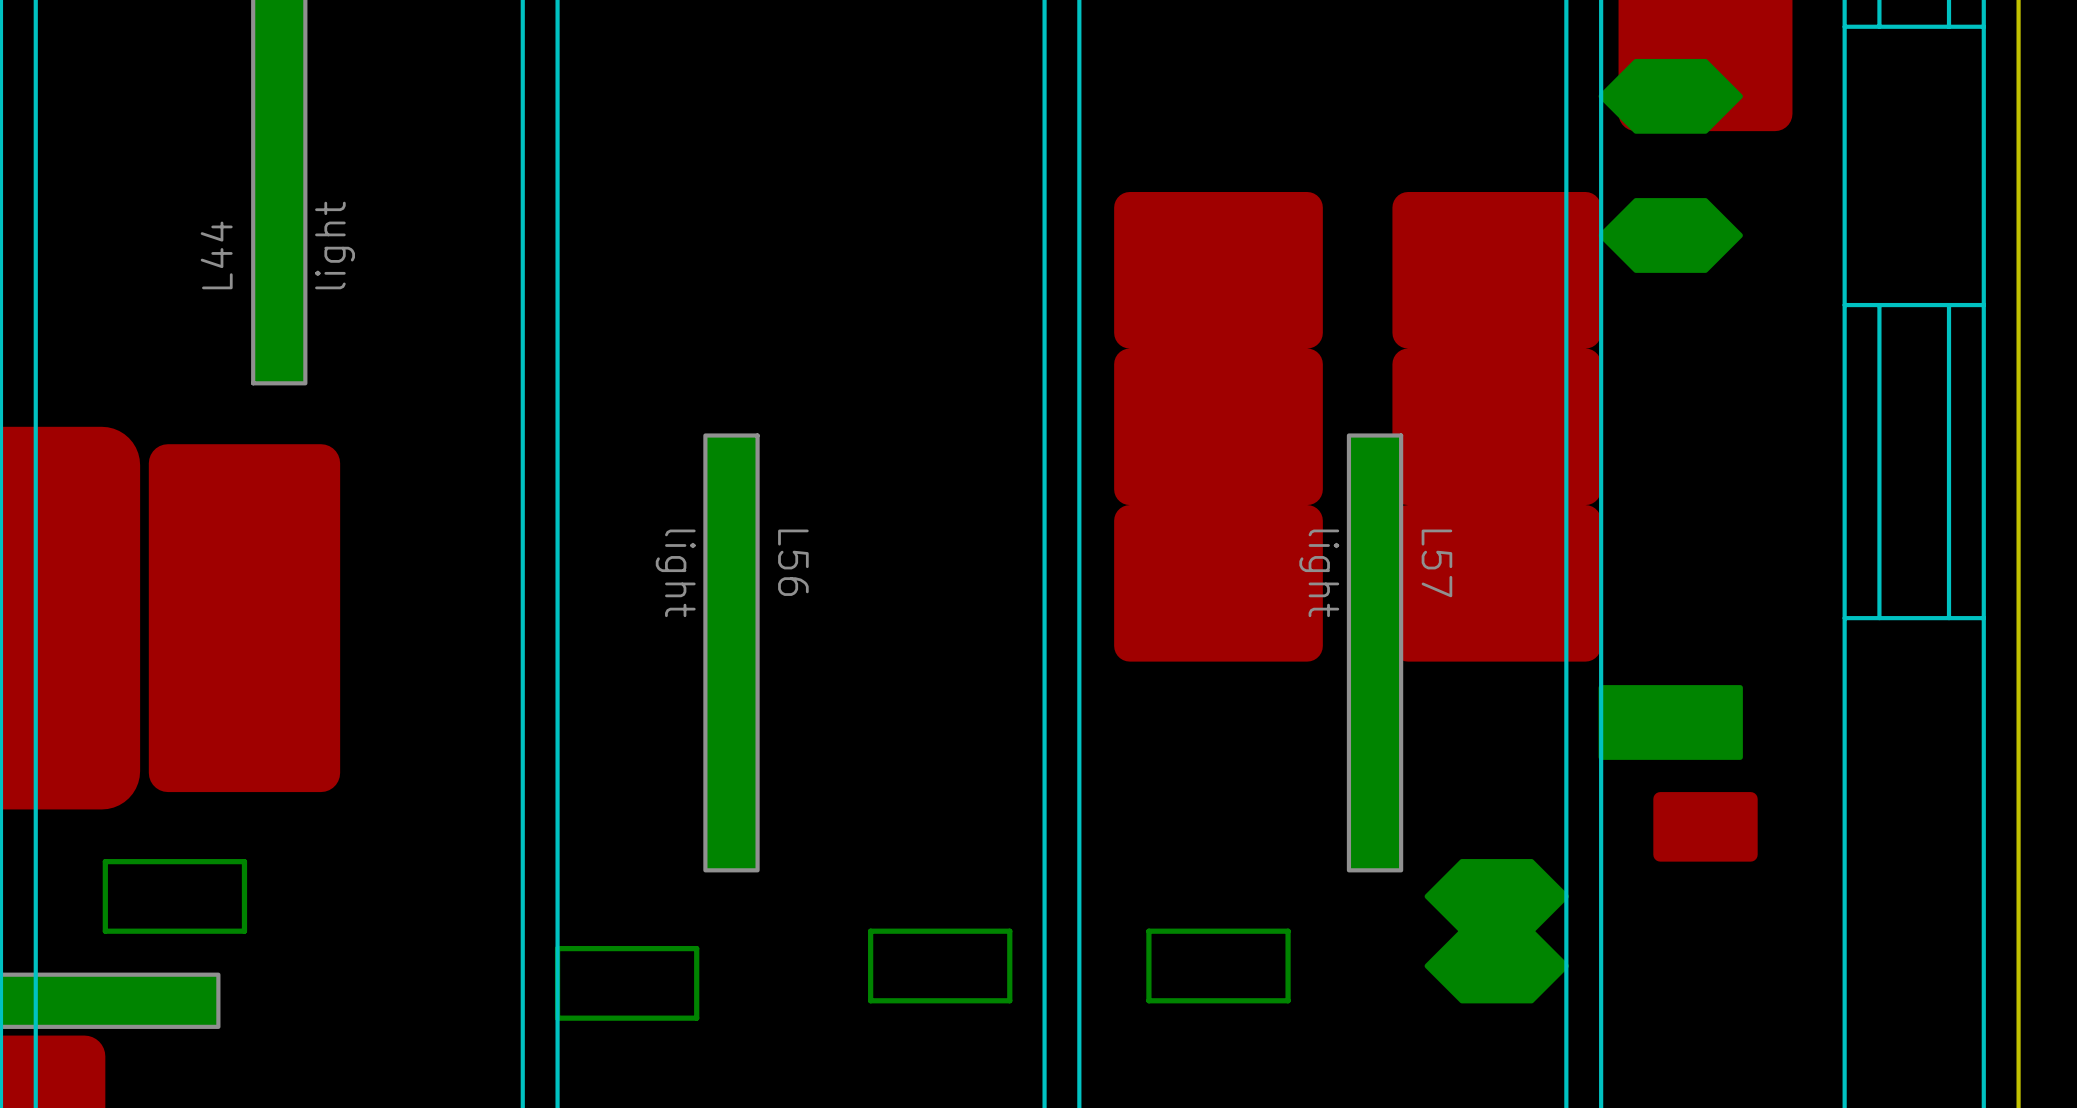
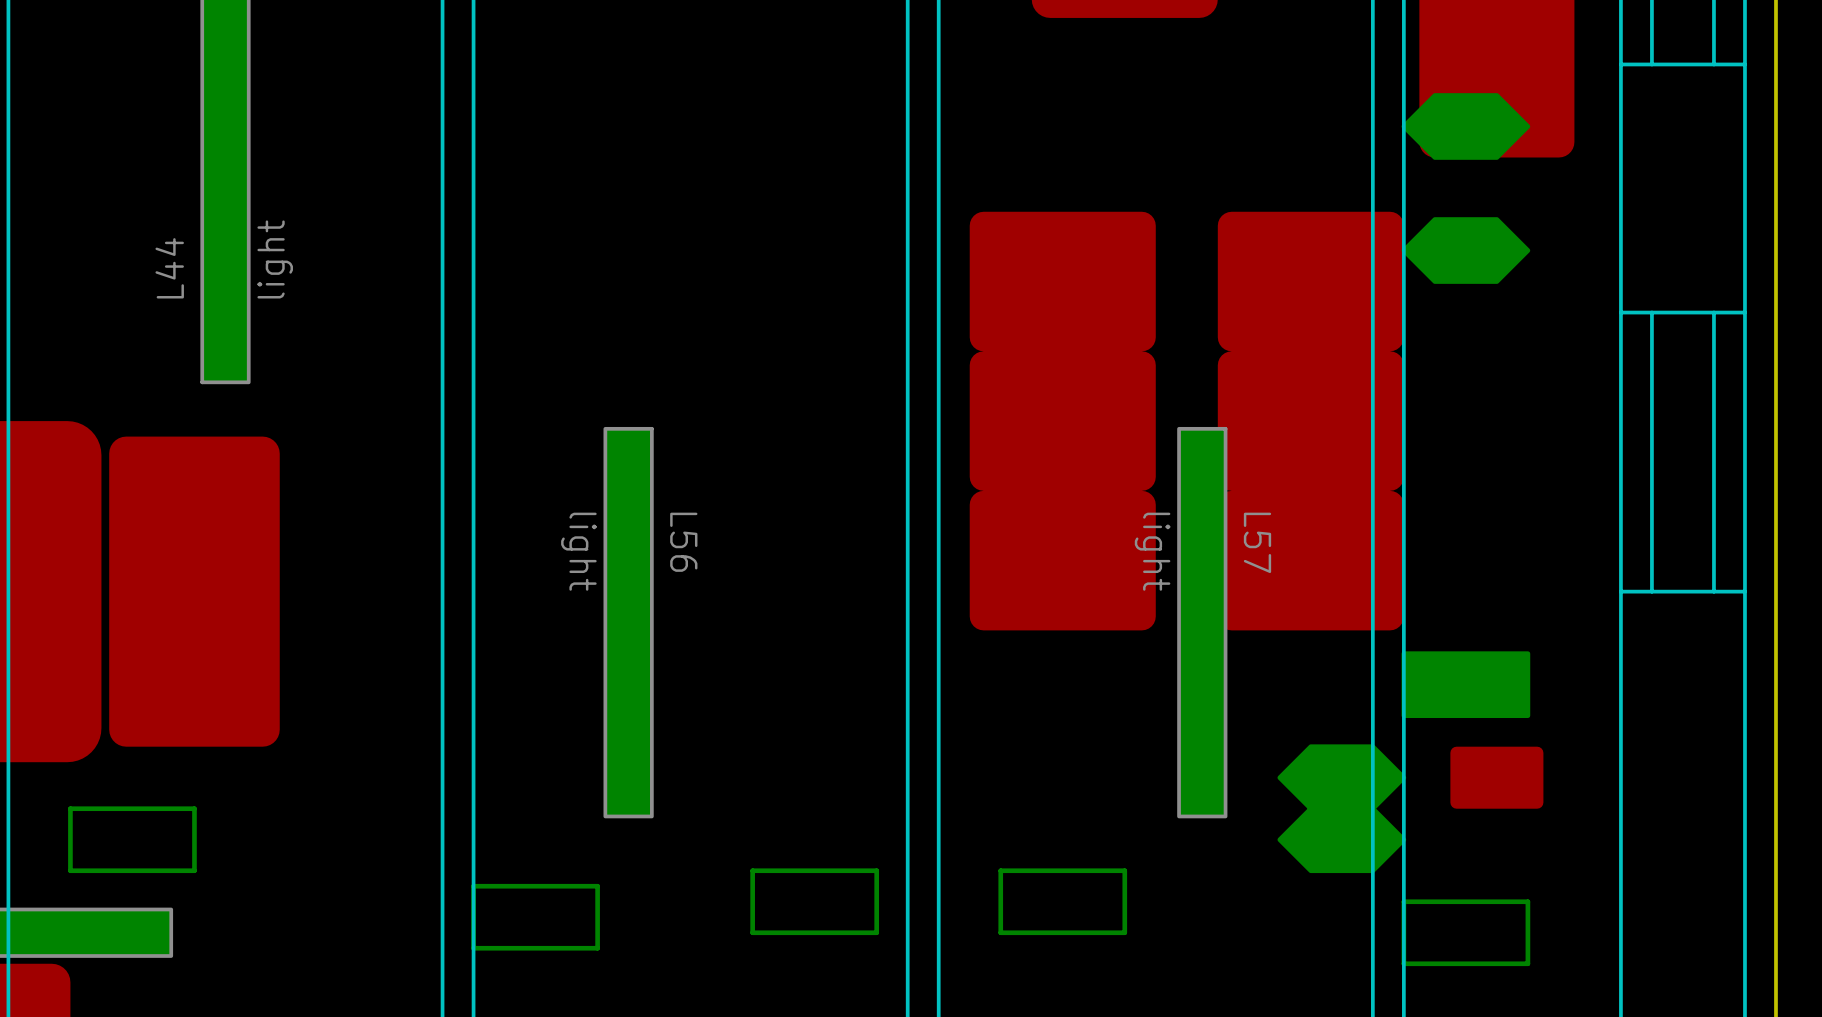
drawing: none -> [1277, 744, 1407, 812]
drawing position: (1496, 896) -> (1341, 839)
drawing: [1424, 928, 1569, 1004] -> none
bottom track: none -> (1527, 901) (1403, 901) (1403, 963) (1527, 963) (1527, 901)

